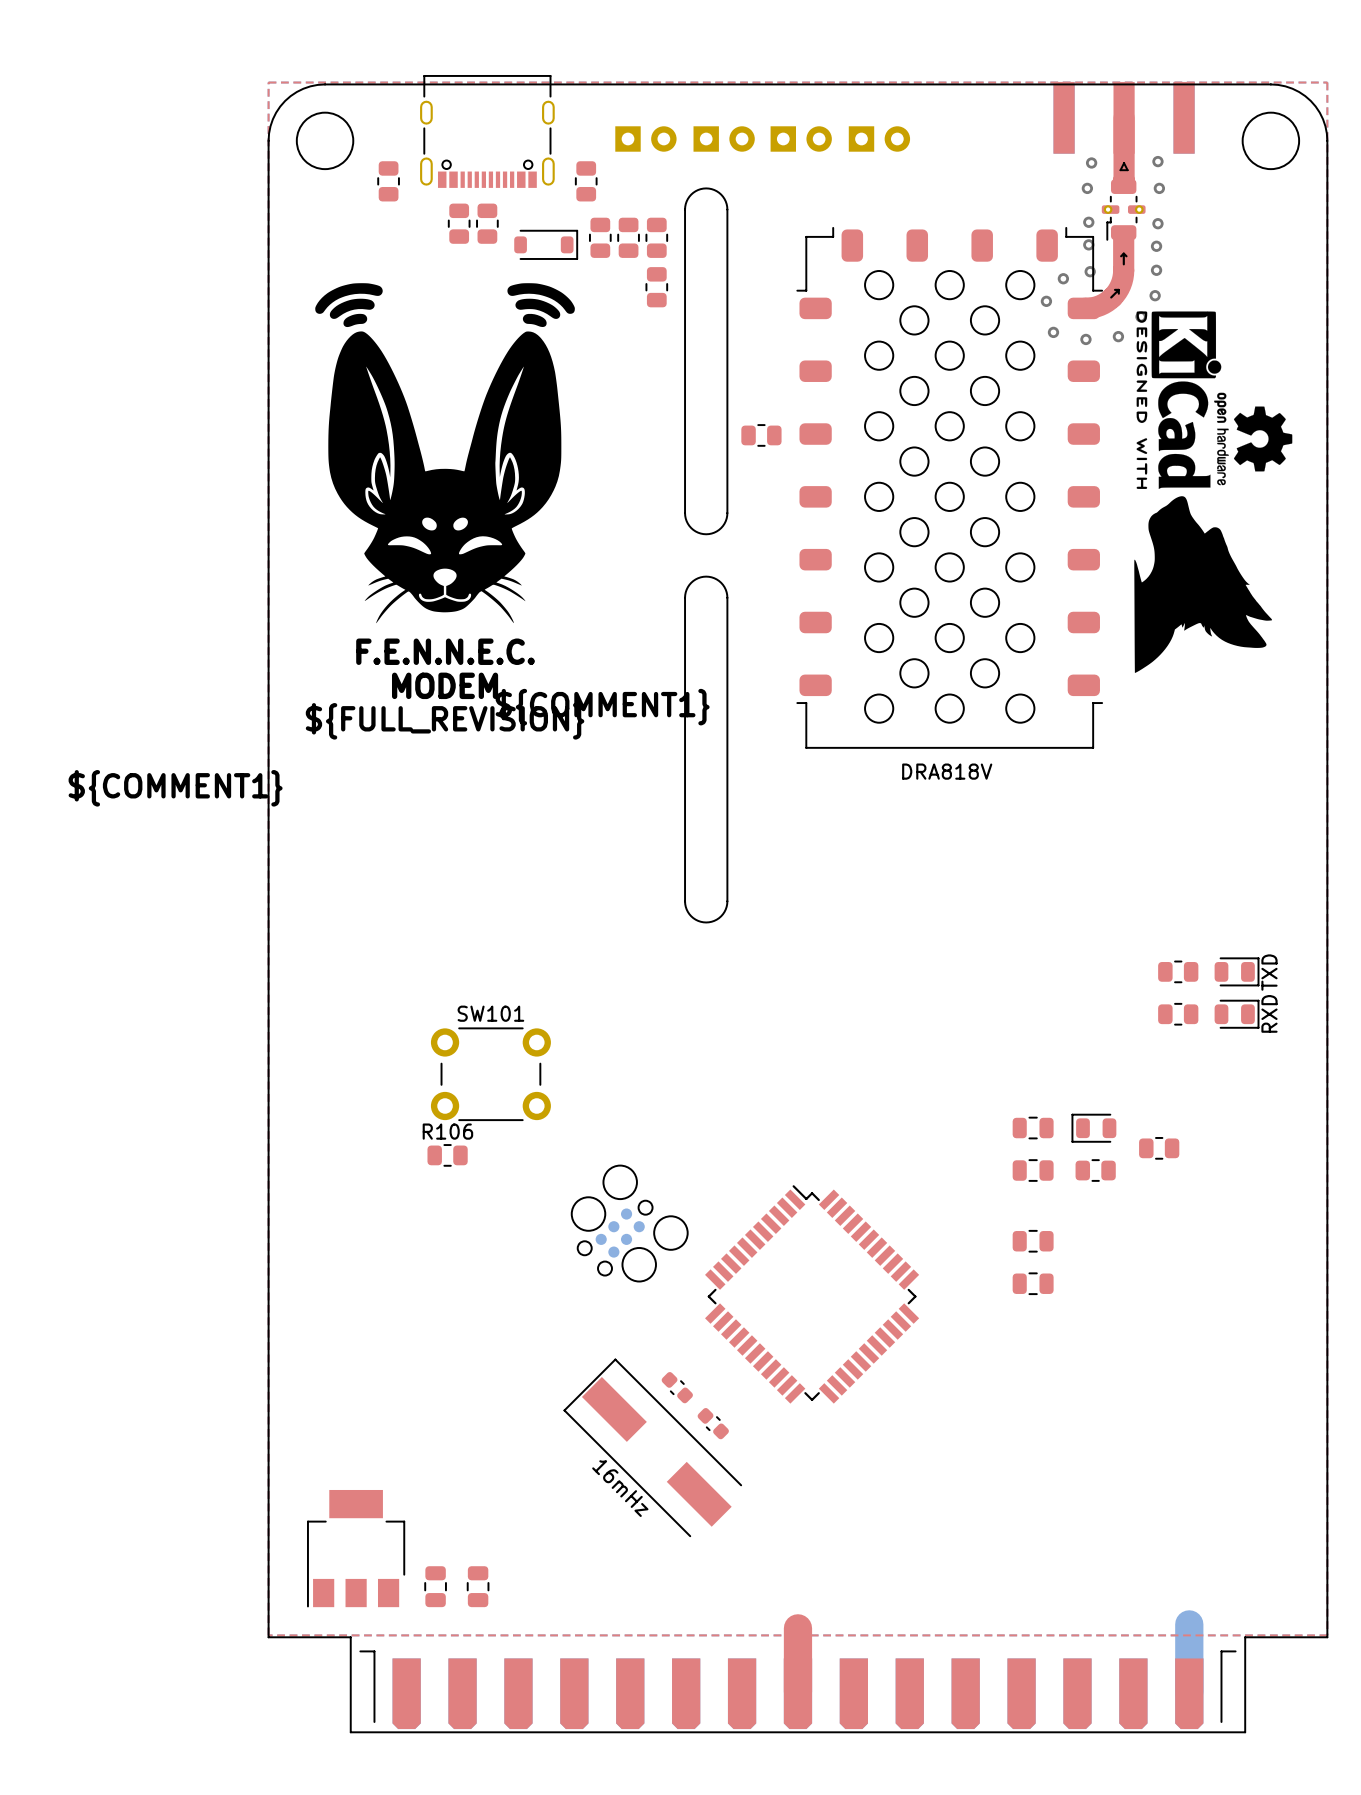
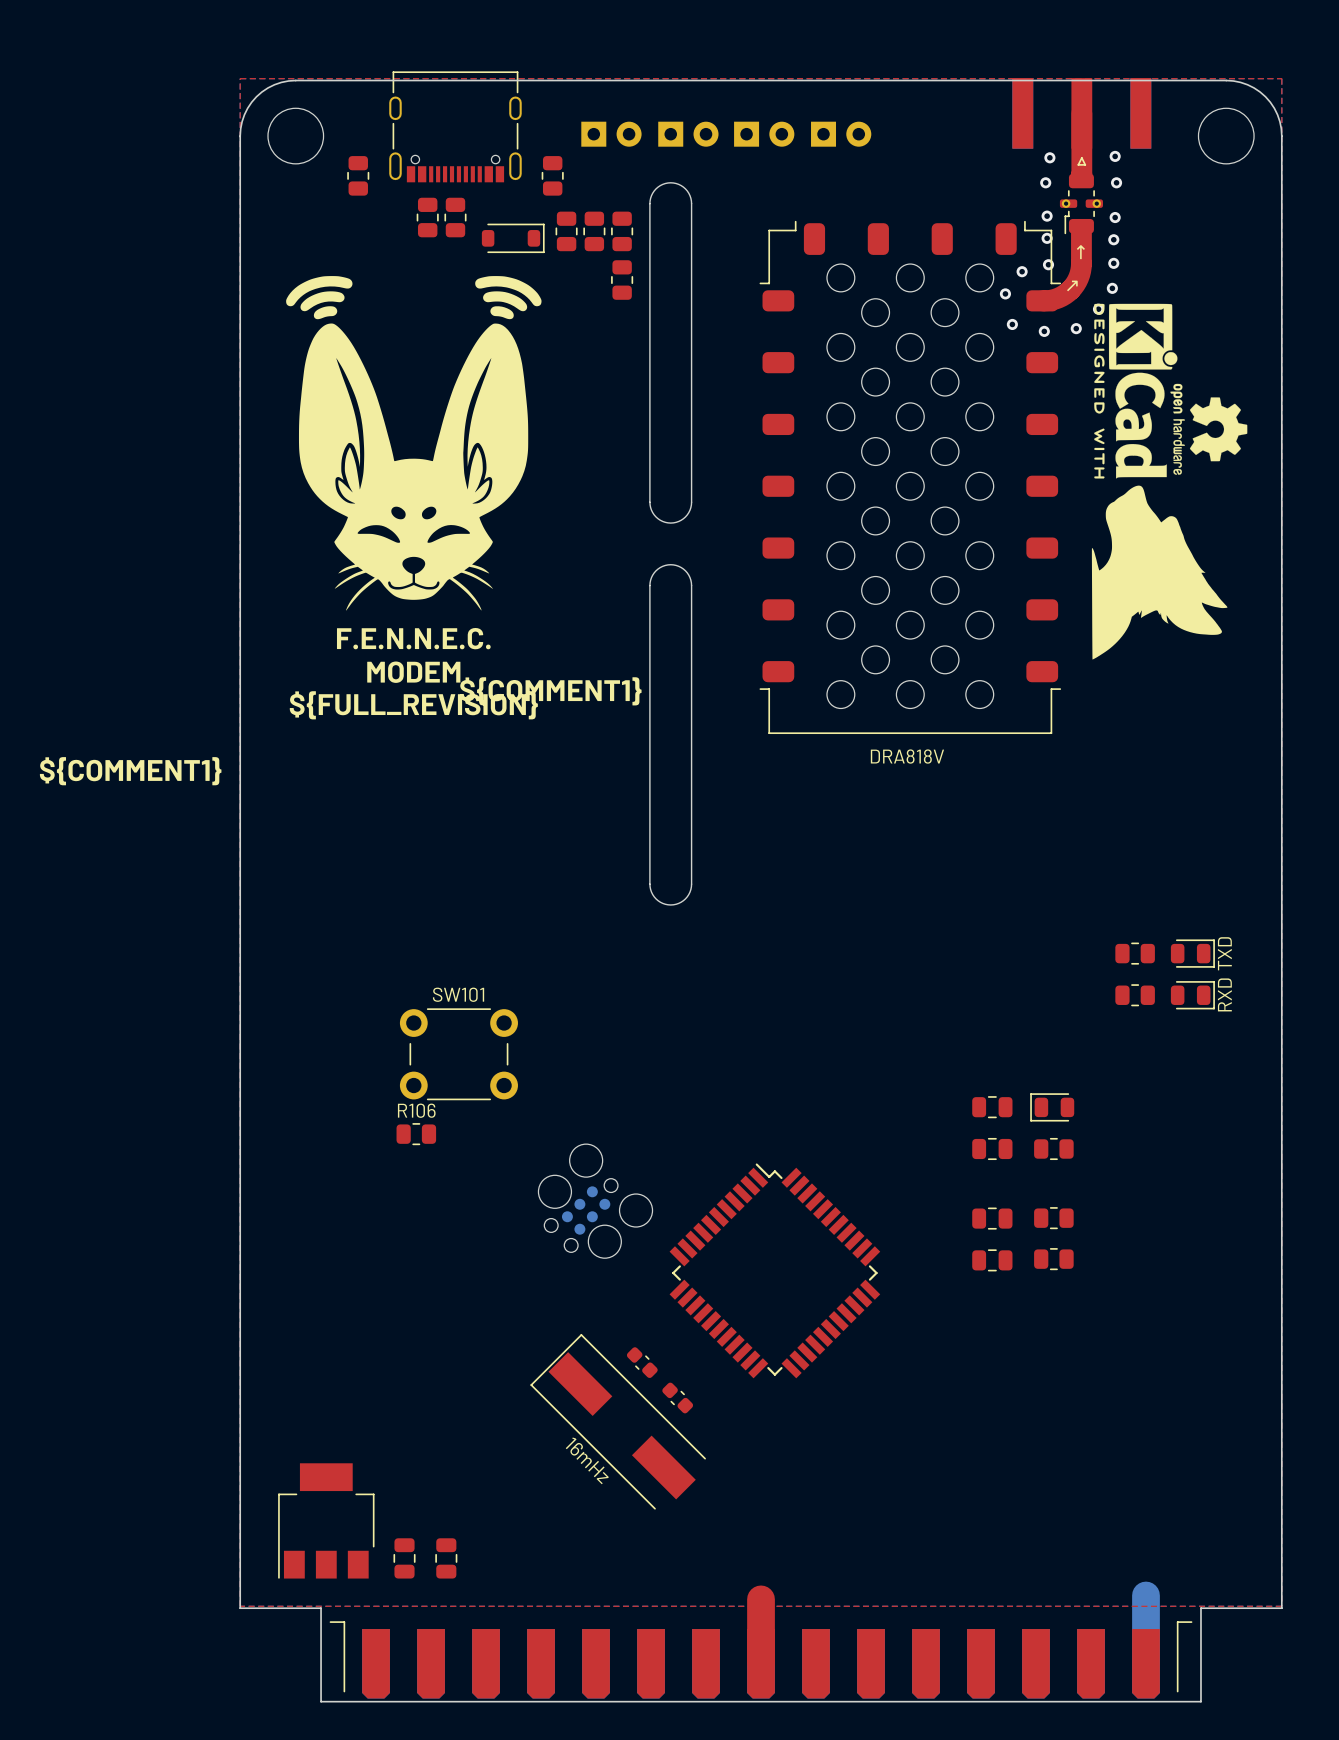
part: (761, 435) -> none
part: (1159, 1148) -> none
part: none -> (1053, 1218)
part: none -> (1053, 1259)

